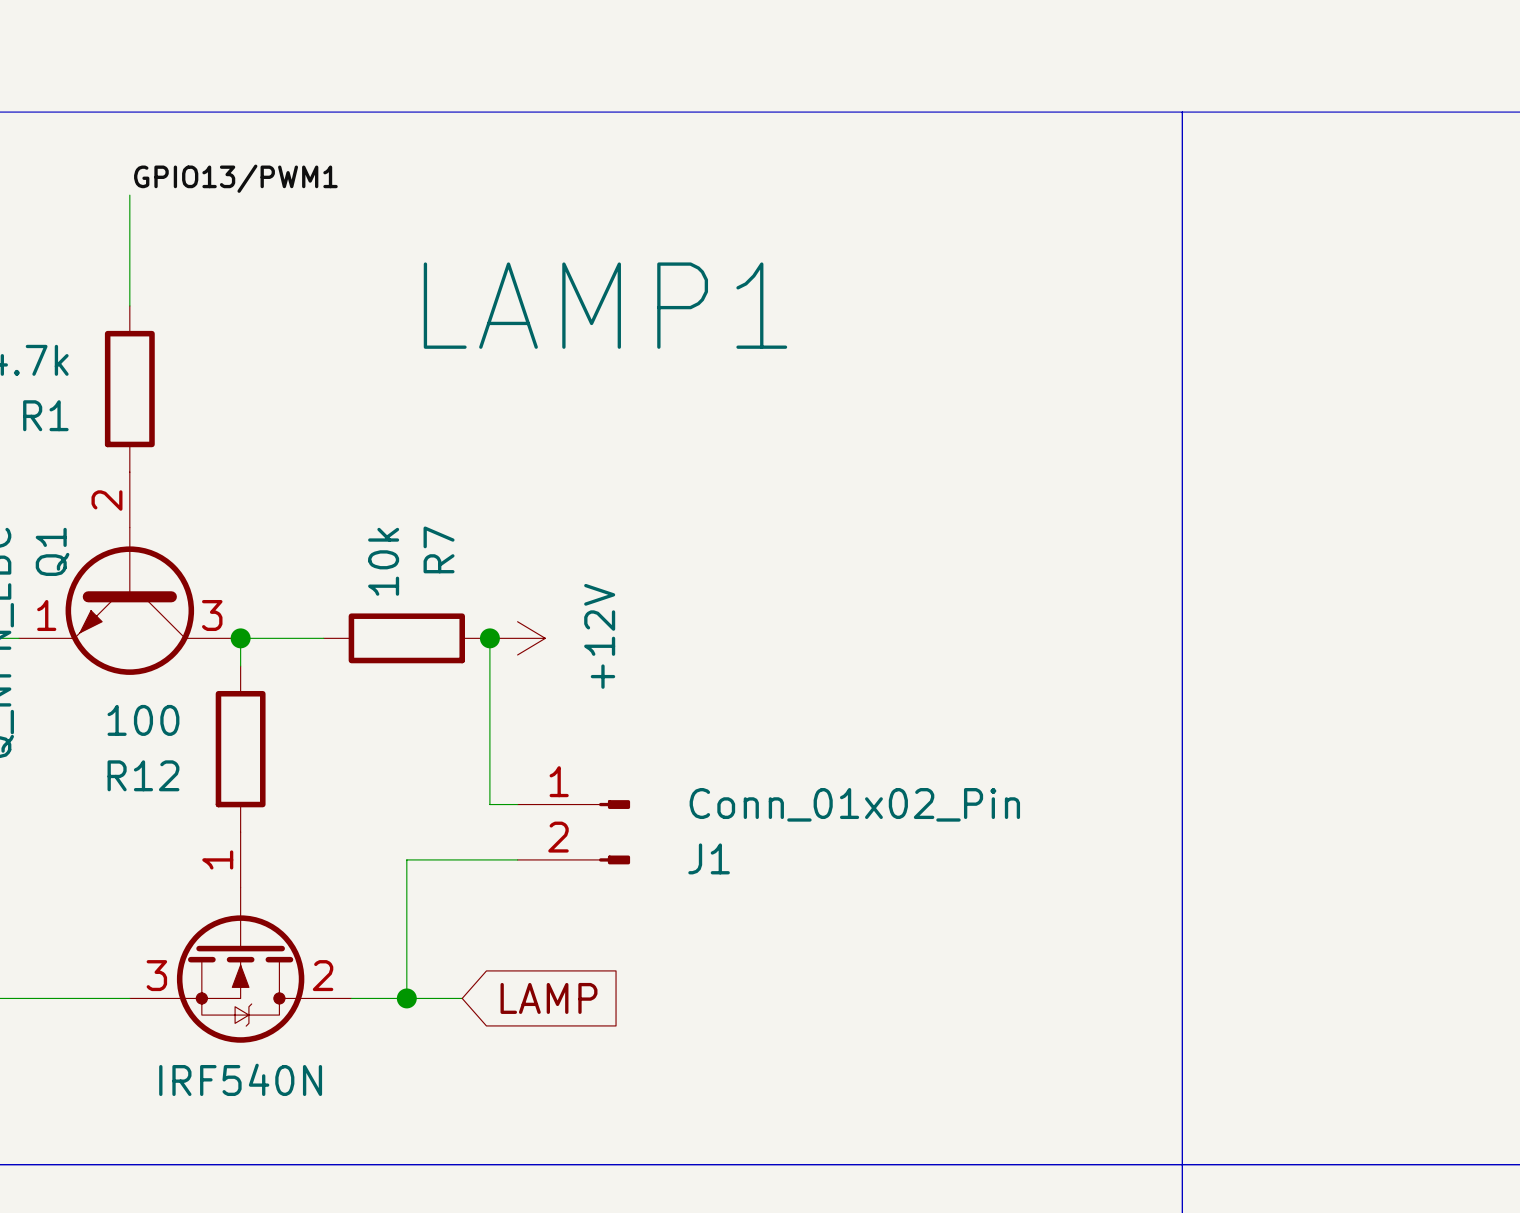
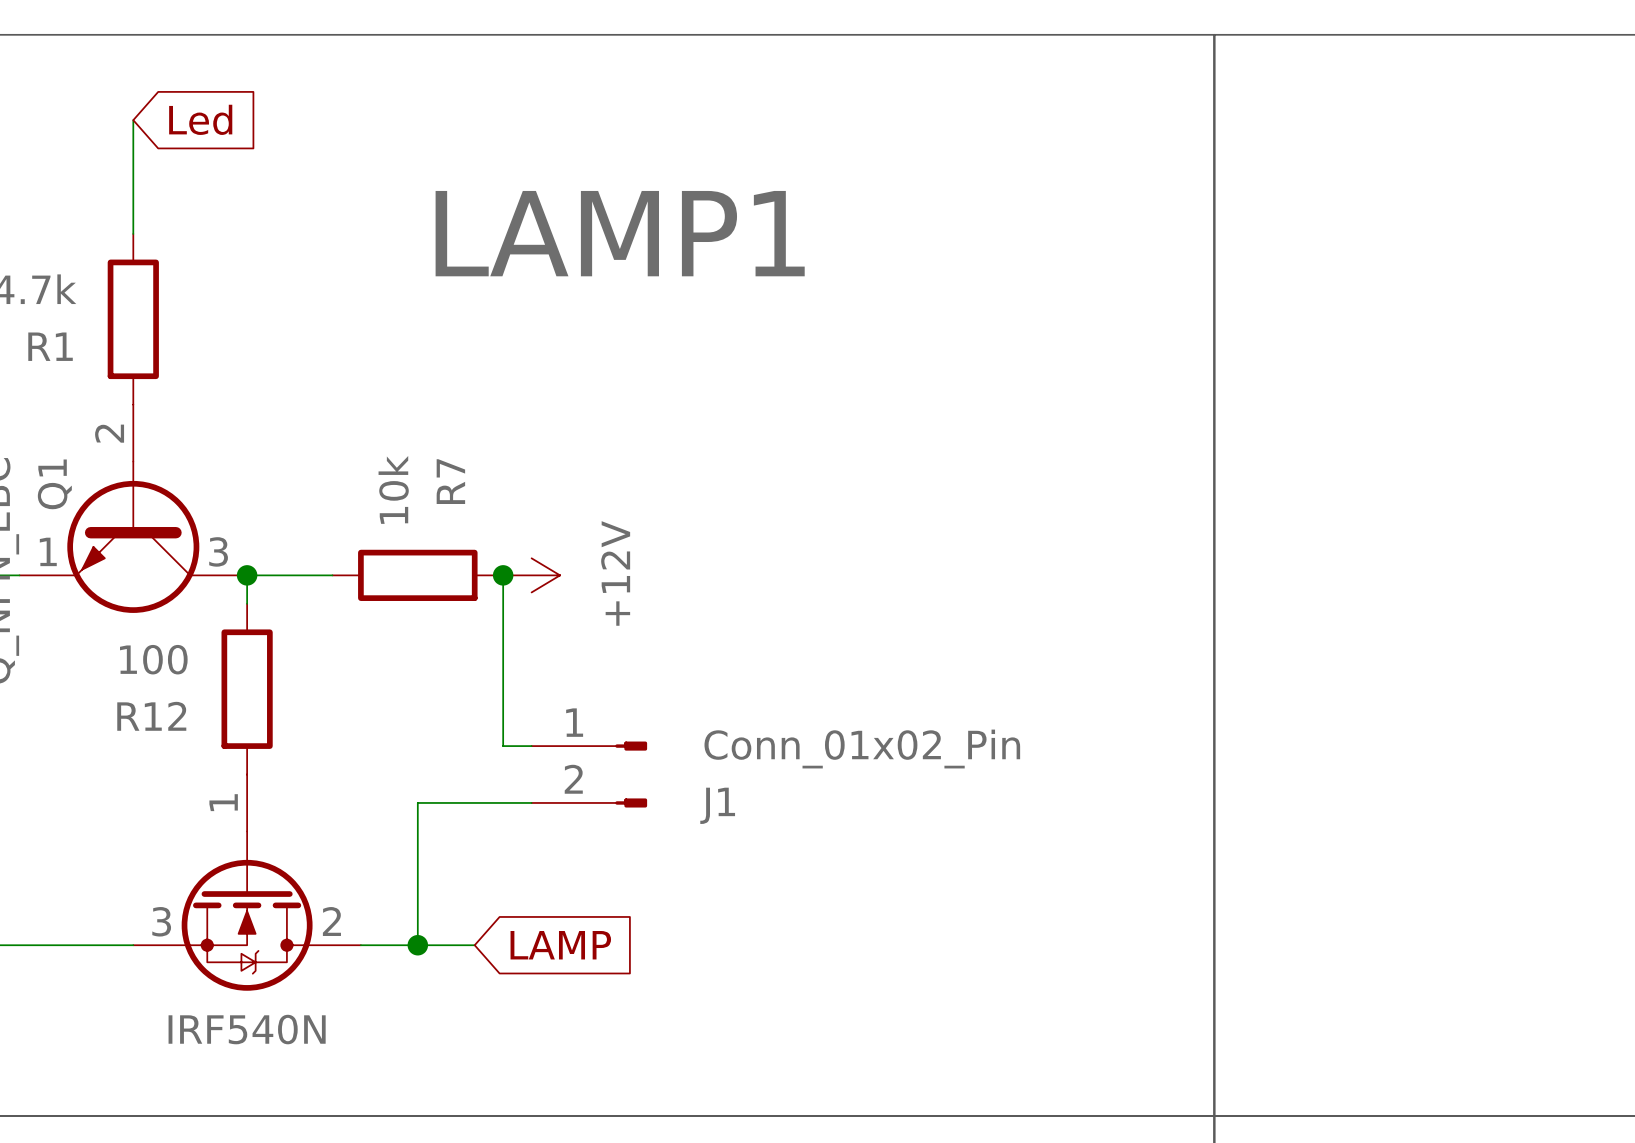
label: GPIO13/PWM1 (235, 178) -> none
global label: none -> Led (200, 119)

